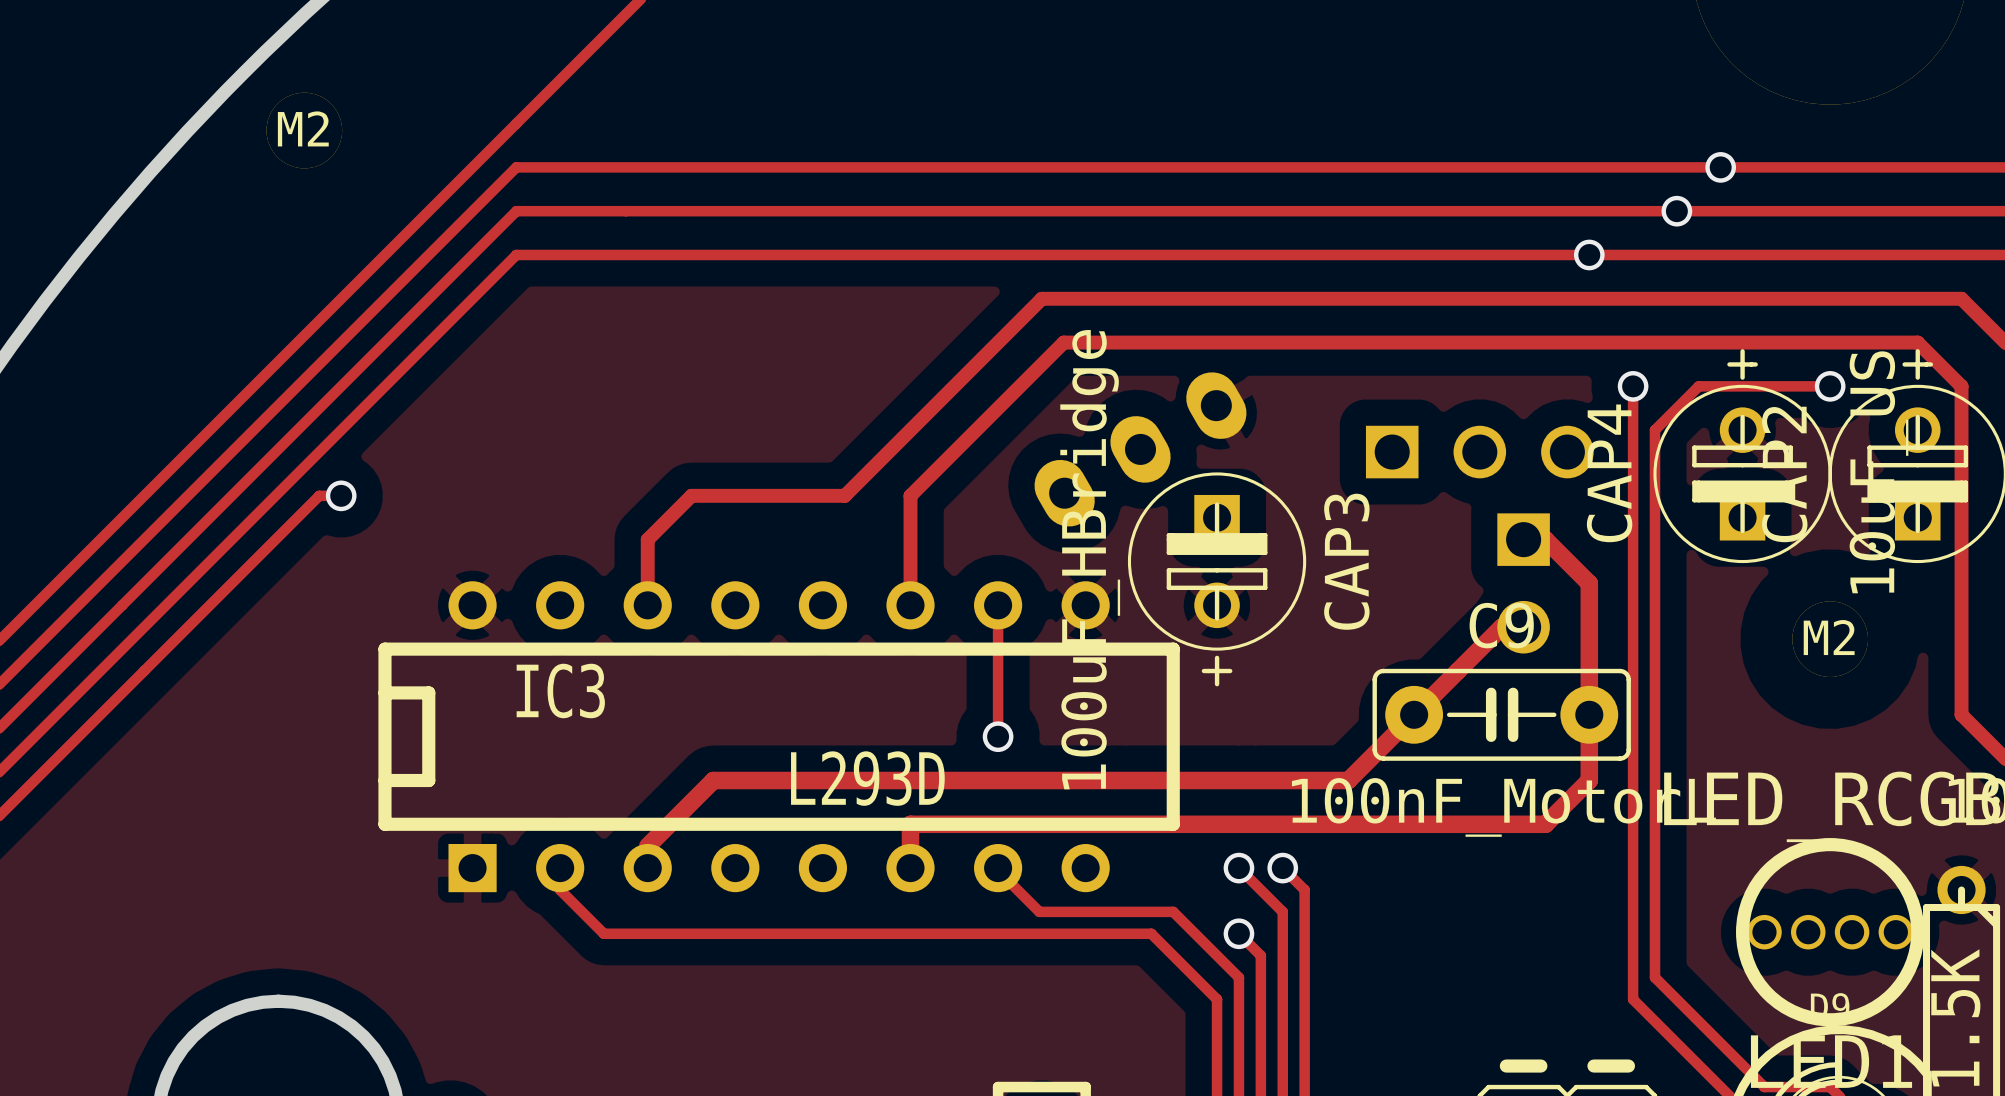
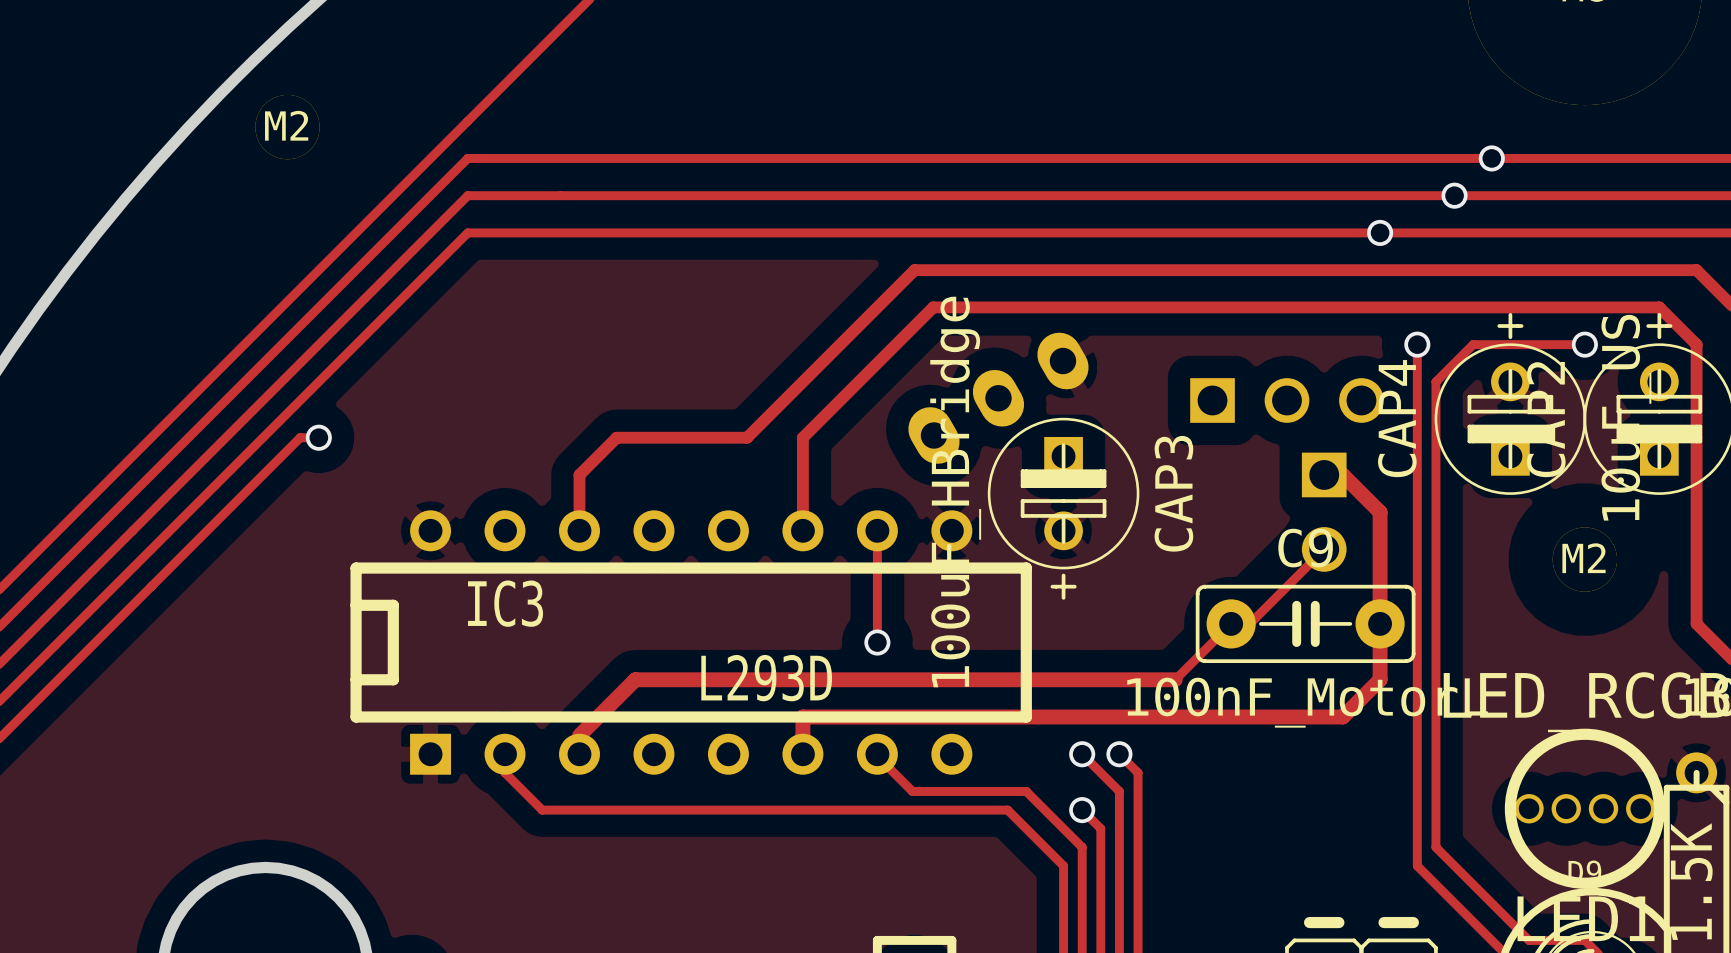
track: (1523, 627) (1501, 627) (1414, 714) -> (1324, 549) (1249, 623) (1231, 623)
track width: thick (1414, 714) (1348, 780) -> thin (1231, 623) (1175, 679)

